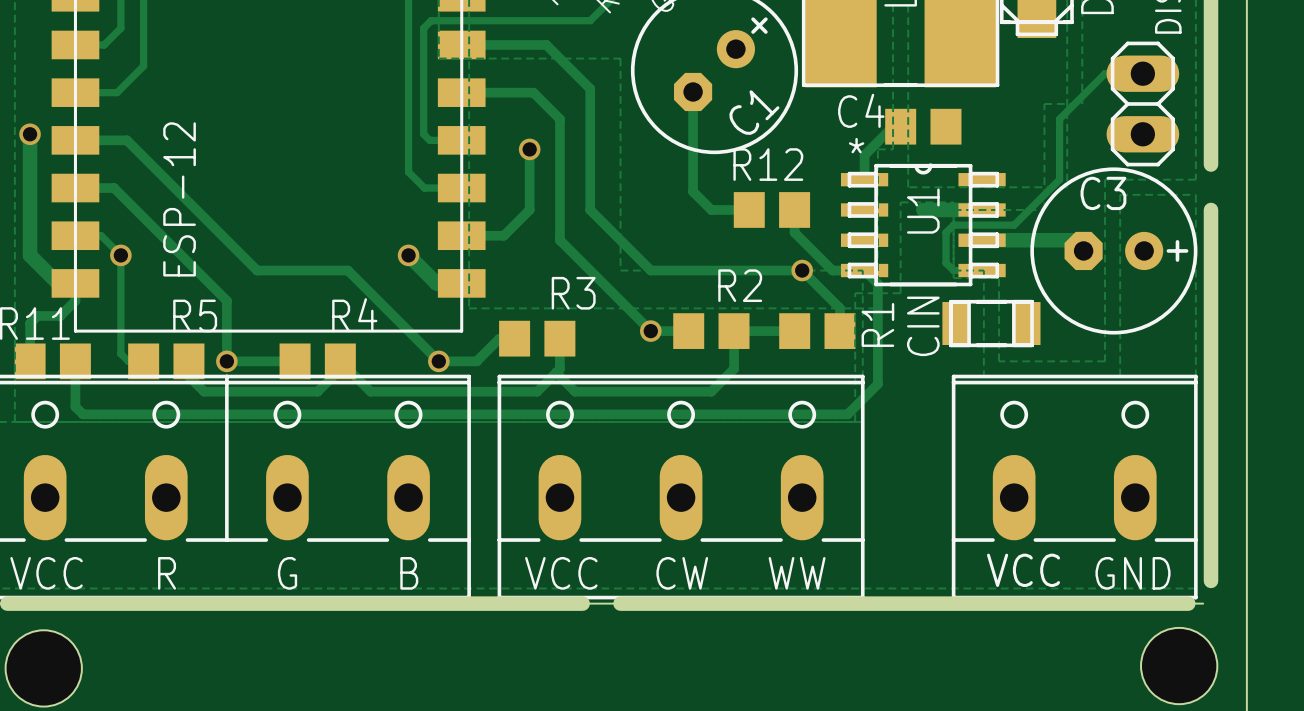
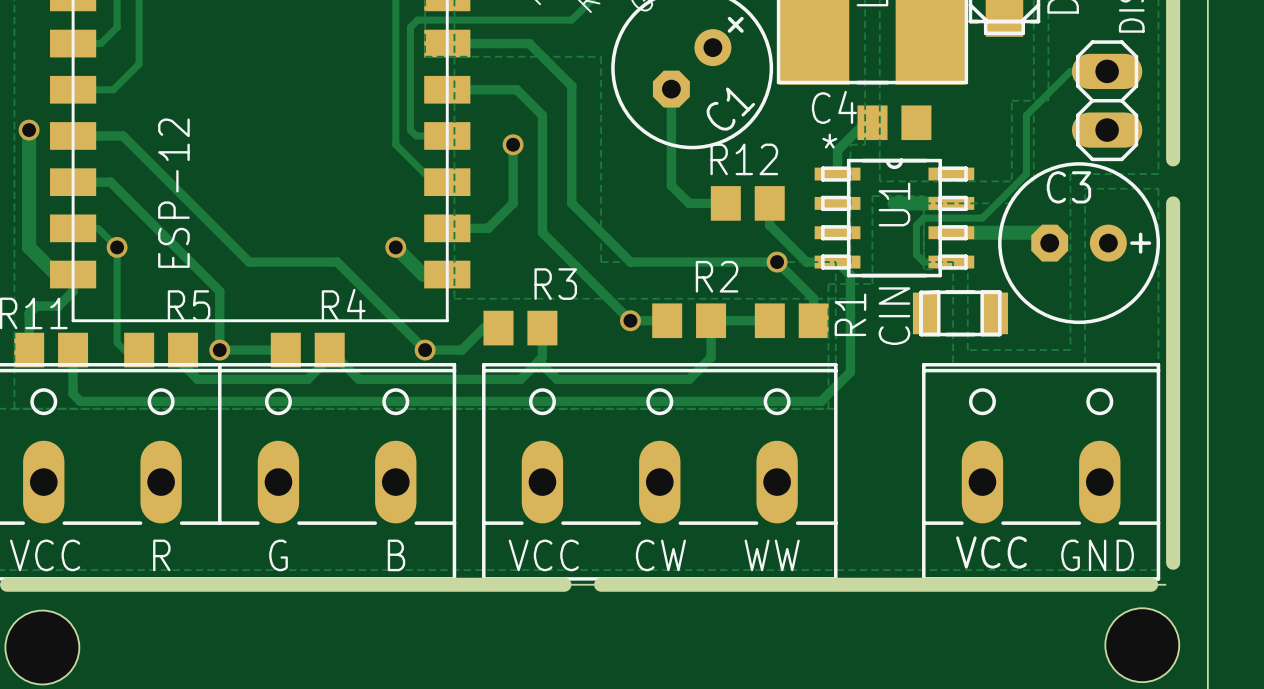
track: (408, 149) (408, 172) (424, 188) (461, 188) -> (395, 144) (425, 174) (439, 174) (447, 182)

